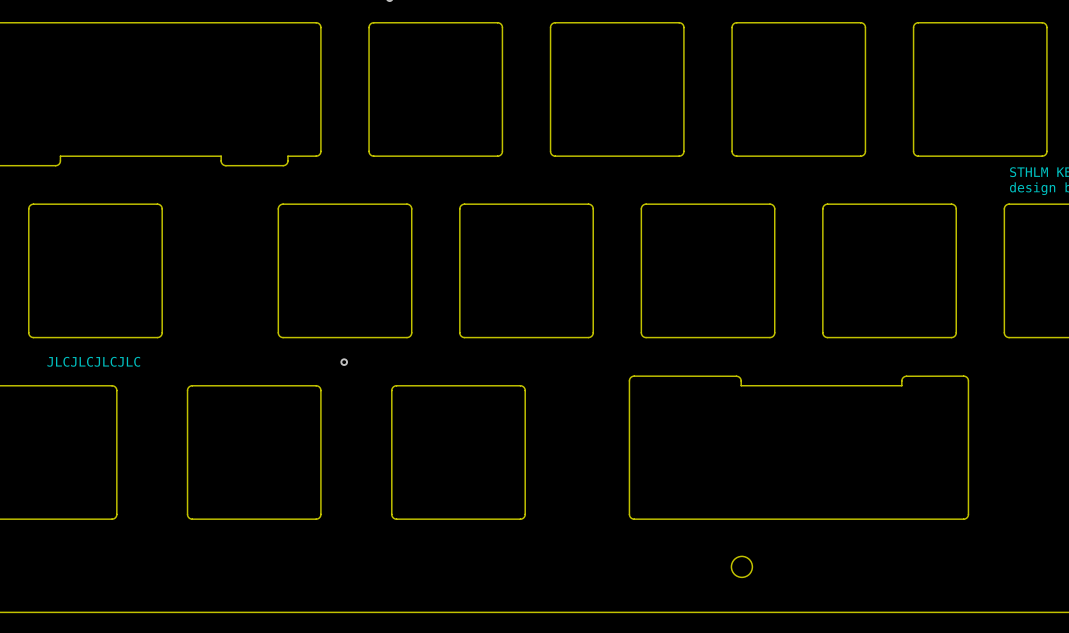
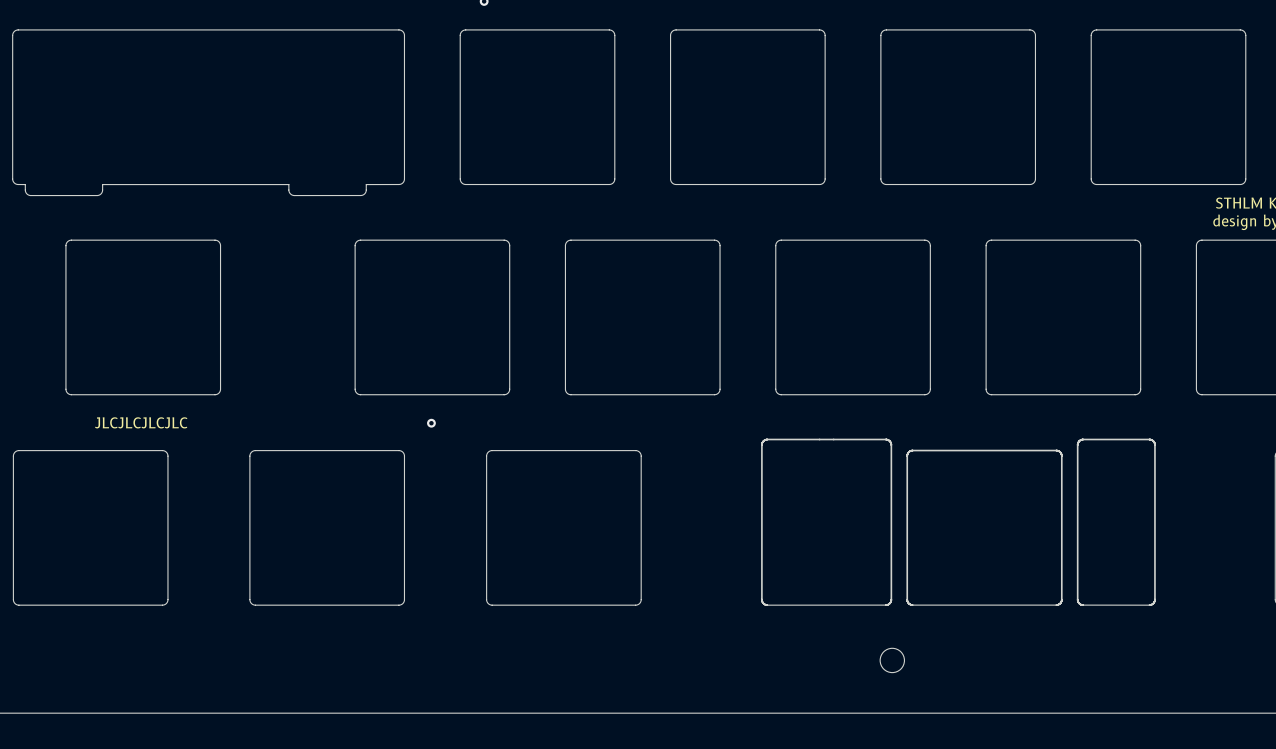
board edge: none -> (767, 605) (885, 605) (890, 602) (891, 445) (889, 440) (767, 439) (762, 441) (761, 599) (763, 603) (767, 605)
board edge: (883, 519) (963, 519) (967, 516) (968, 380) (966, 376) (905, 376) (902, 379) (901, 385) (741, 385) (740, 379) (737, 376) (630, 377) (630, 517) (759, 519) -> (1056, 605) (1060, 603) (1061, 599) (1061, 455) (1059, 451) (1056, 450) (912, 450) (908, 452) (907, 599) (909, 603) (912, 605)
board edge: none -> (1149, 605) (1153, 603) (1154, 599) (1154, 442) (1149, 439) (1081, 439) (1077, 445) (1078, 601) (1082, 605) (1149, 605)

